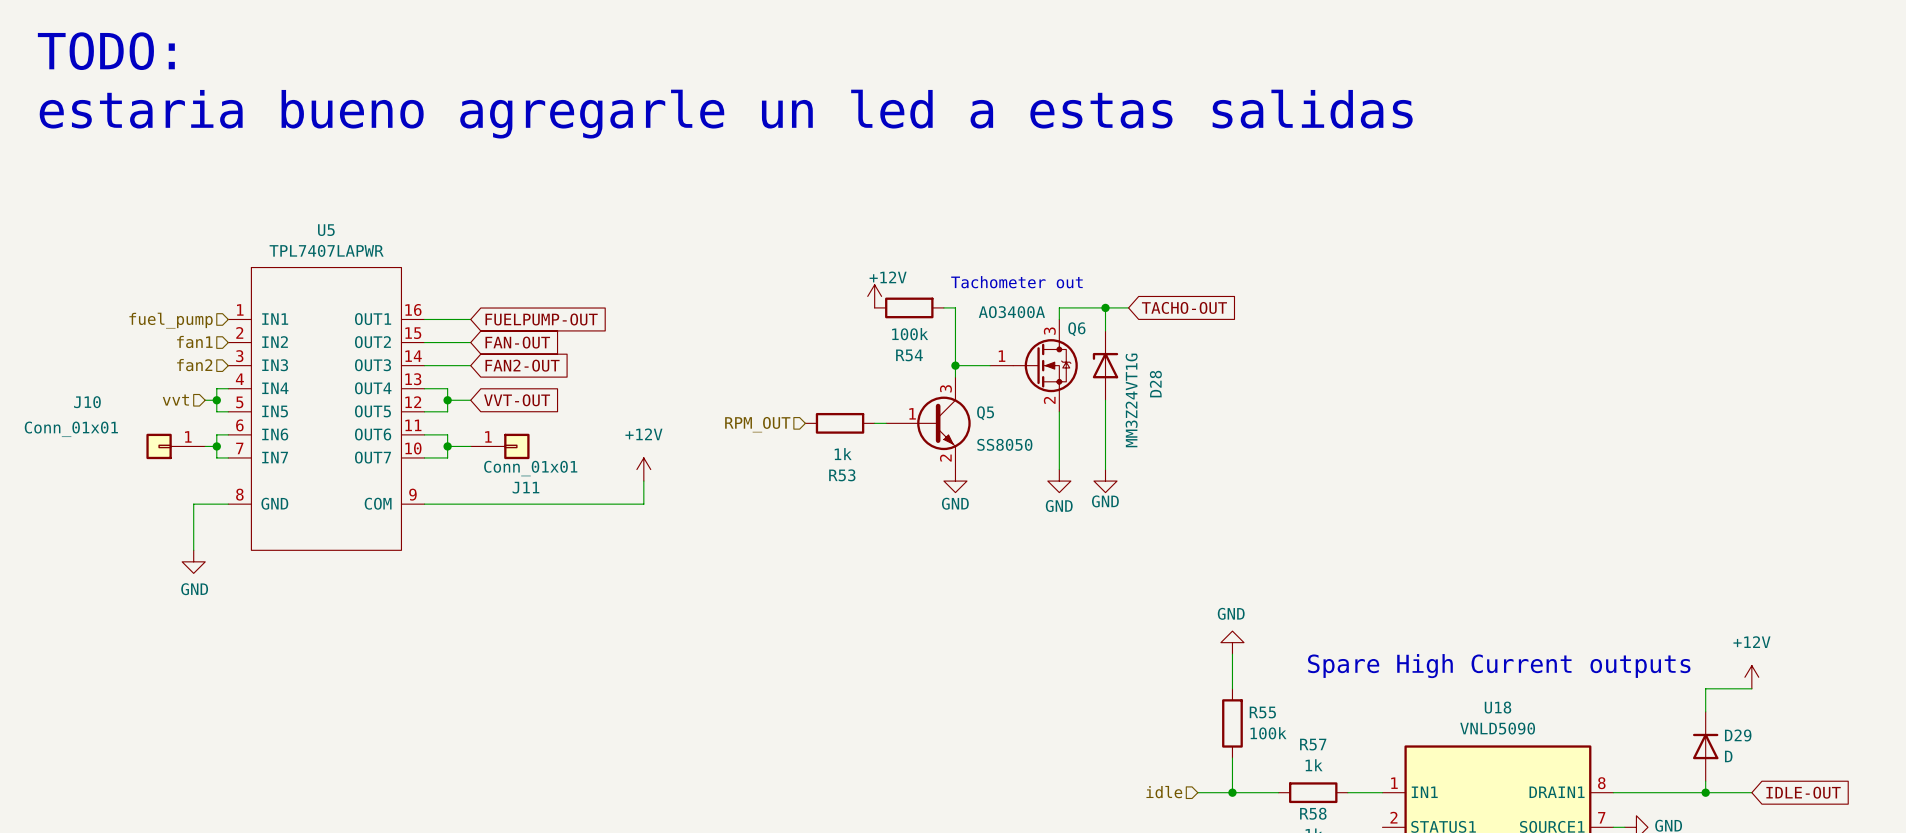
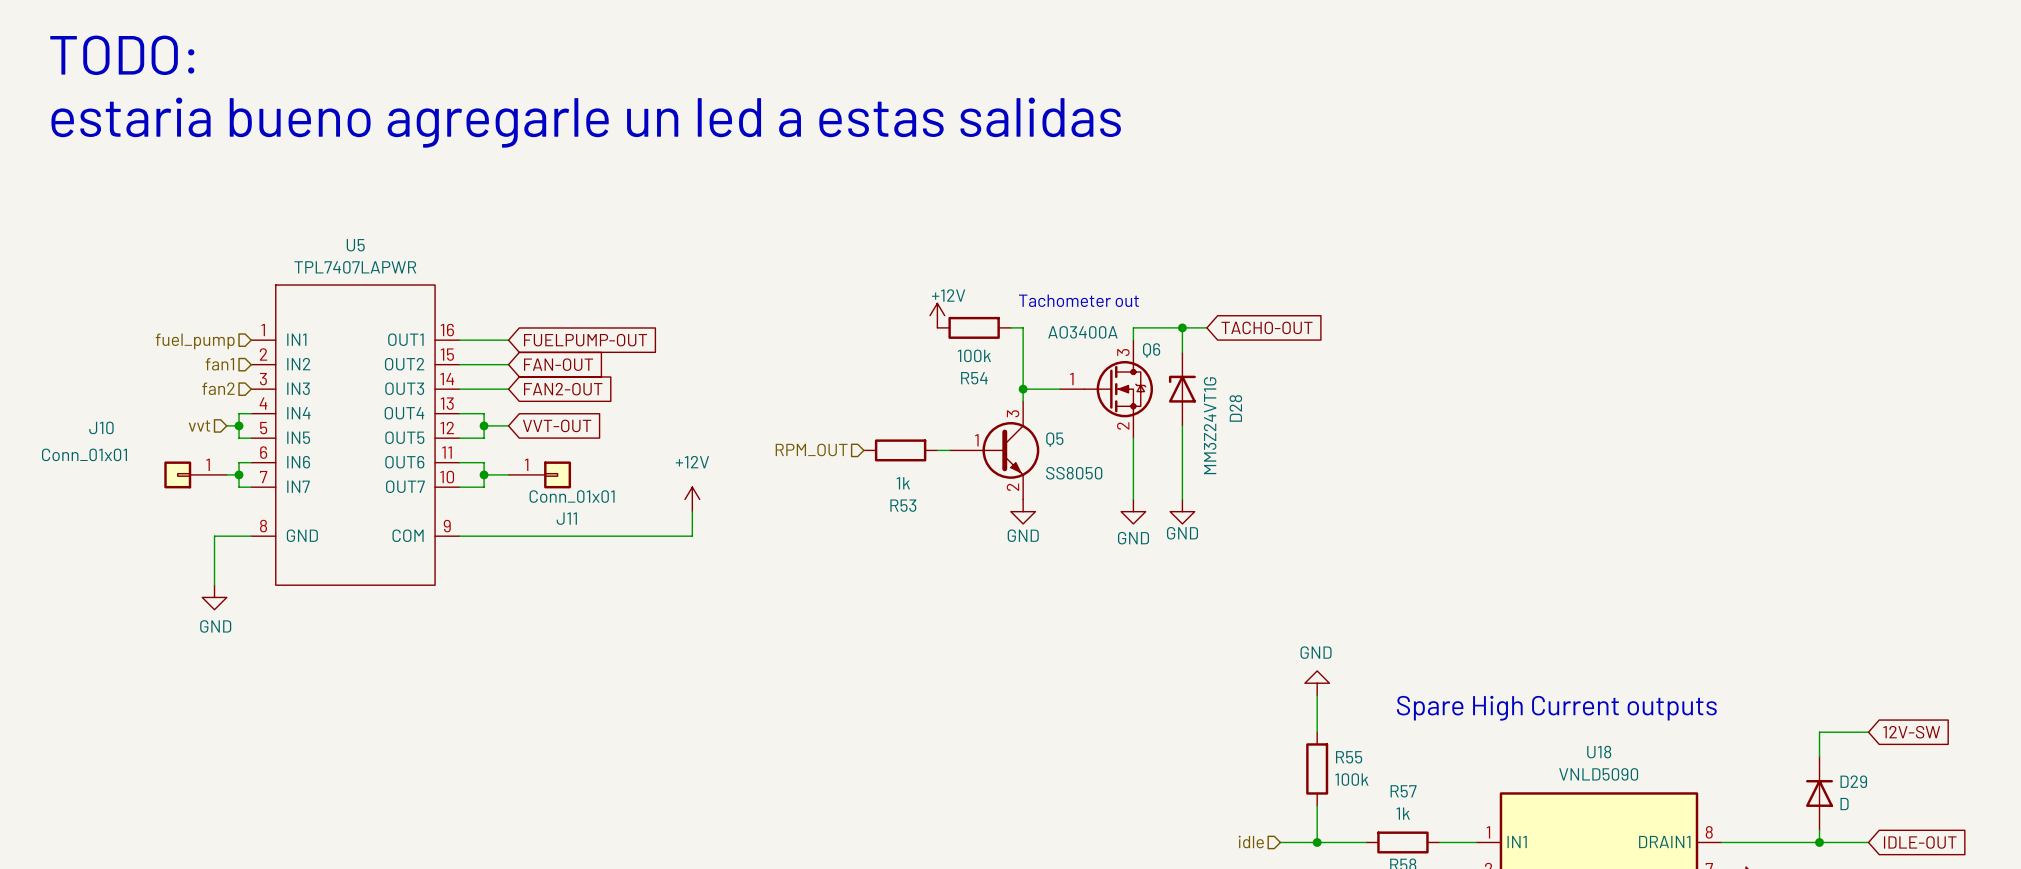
power symbol: +12V (1751, 677) -> none
global label: none -> 12V-SW (1911, 732)

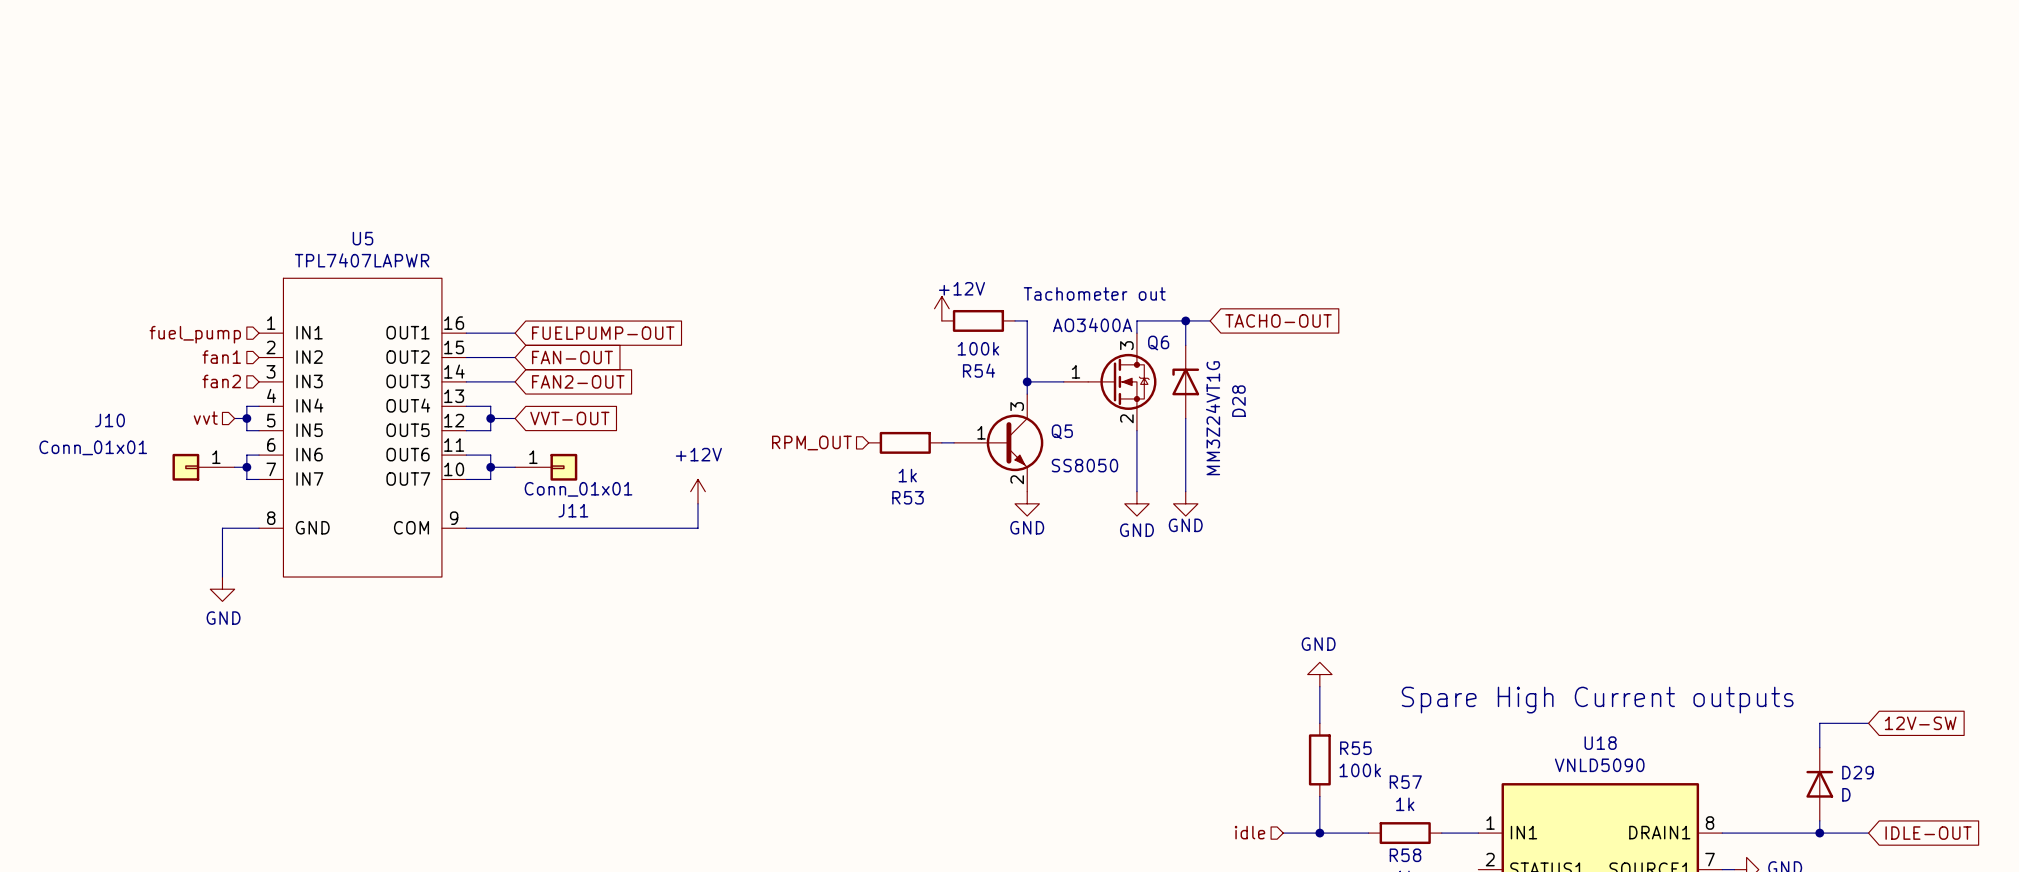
text: TODO: (122, 55) -> none
text: estaria bueno agregarle un led a estas salidas (586, 122) -> none

